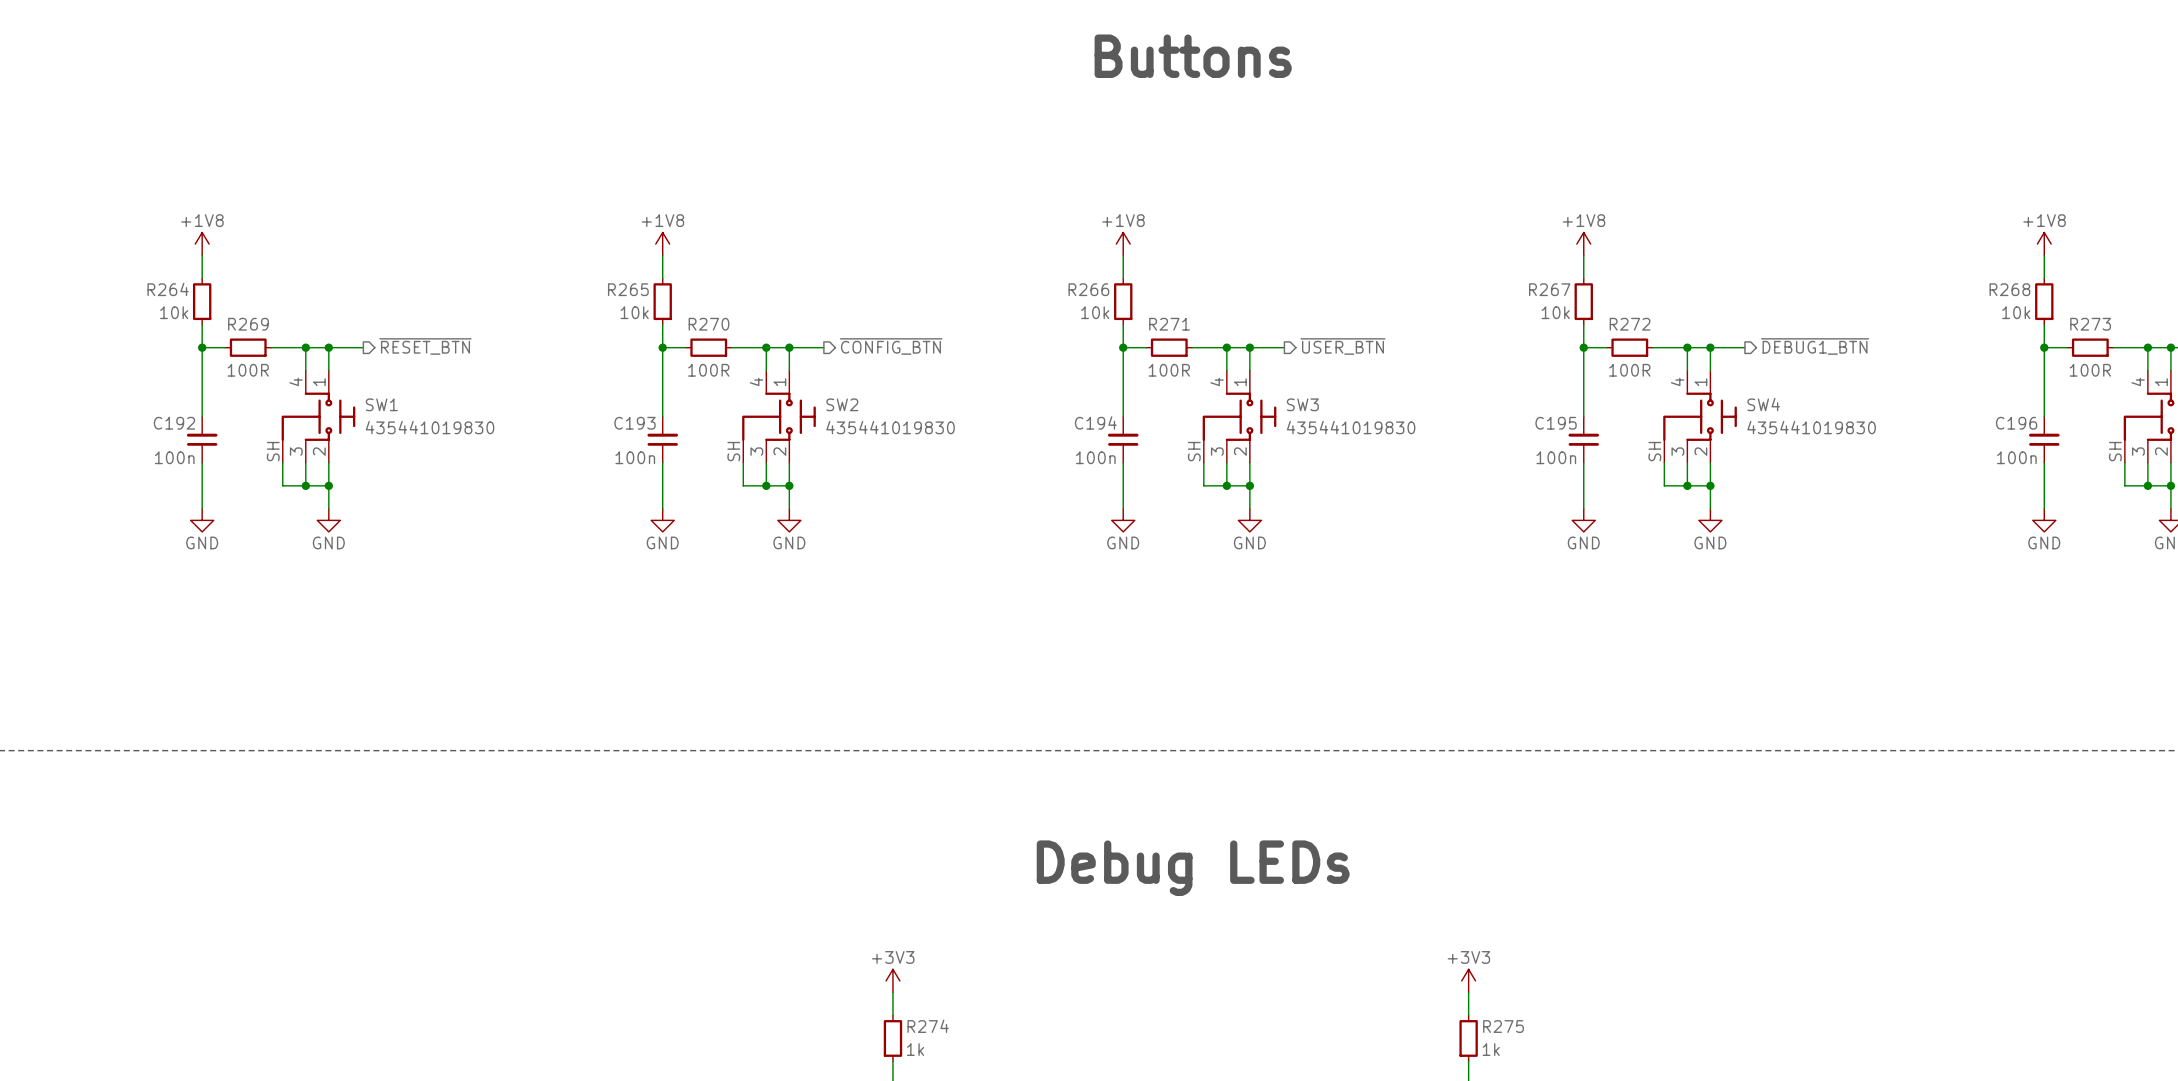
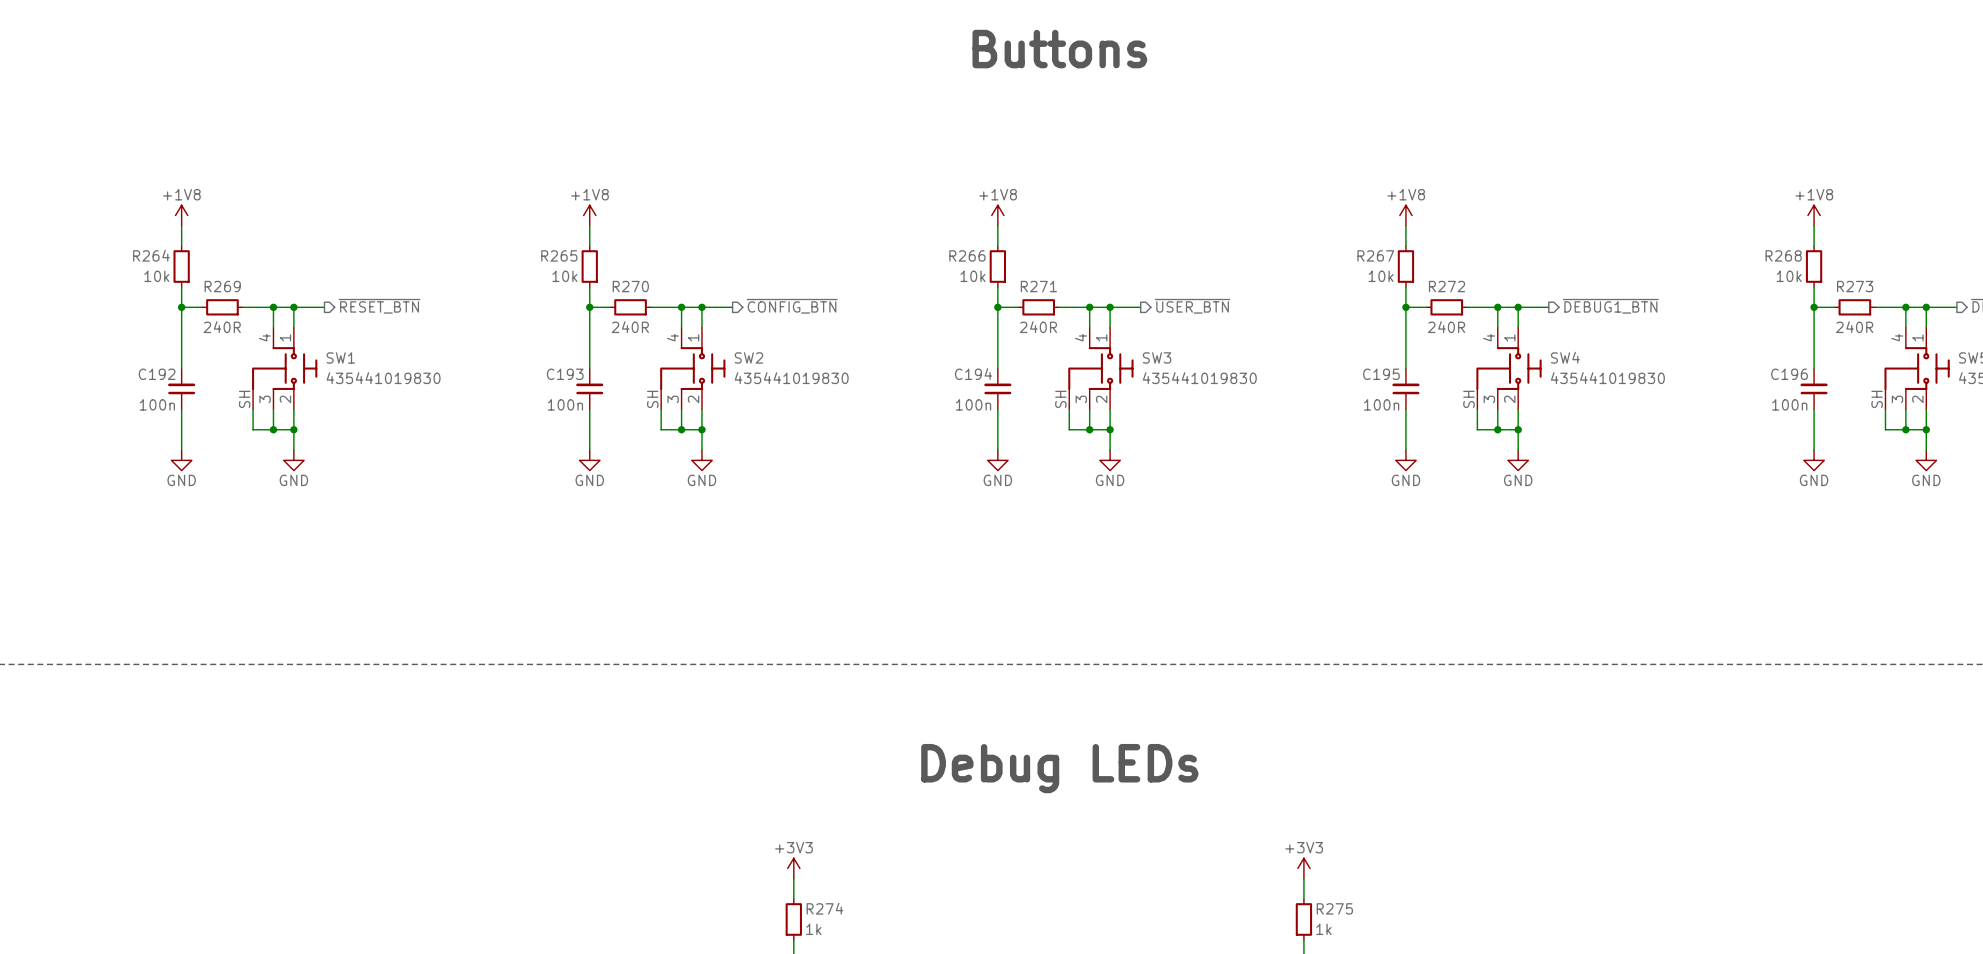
R269 text: 100R (248, 370) -> 240R (222, 327)
R270 text: 100R (708, 370) -> 240R (630, 327)
R271 text: 100R (1169, 370) -> 240R (1038, 327)
R272 text: 100R (1629, 370) -> 240R (1446, 327)
R273 text: 100R (2090, 370) -> 240R (1854, 327)

